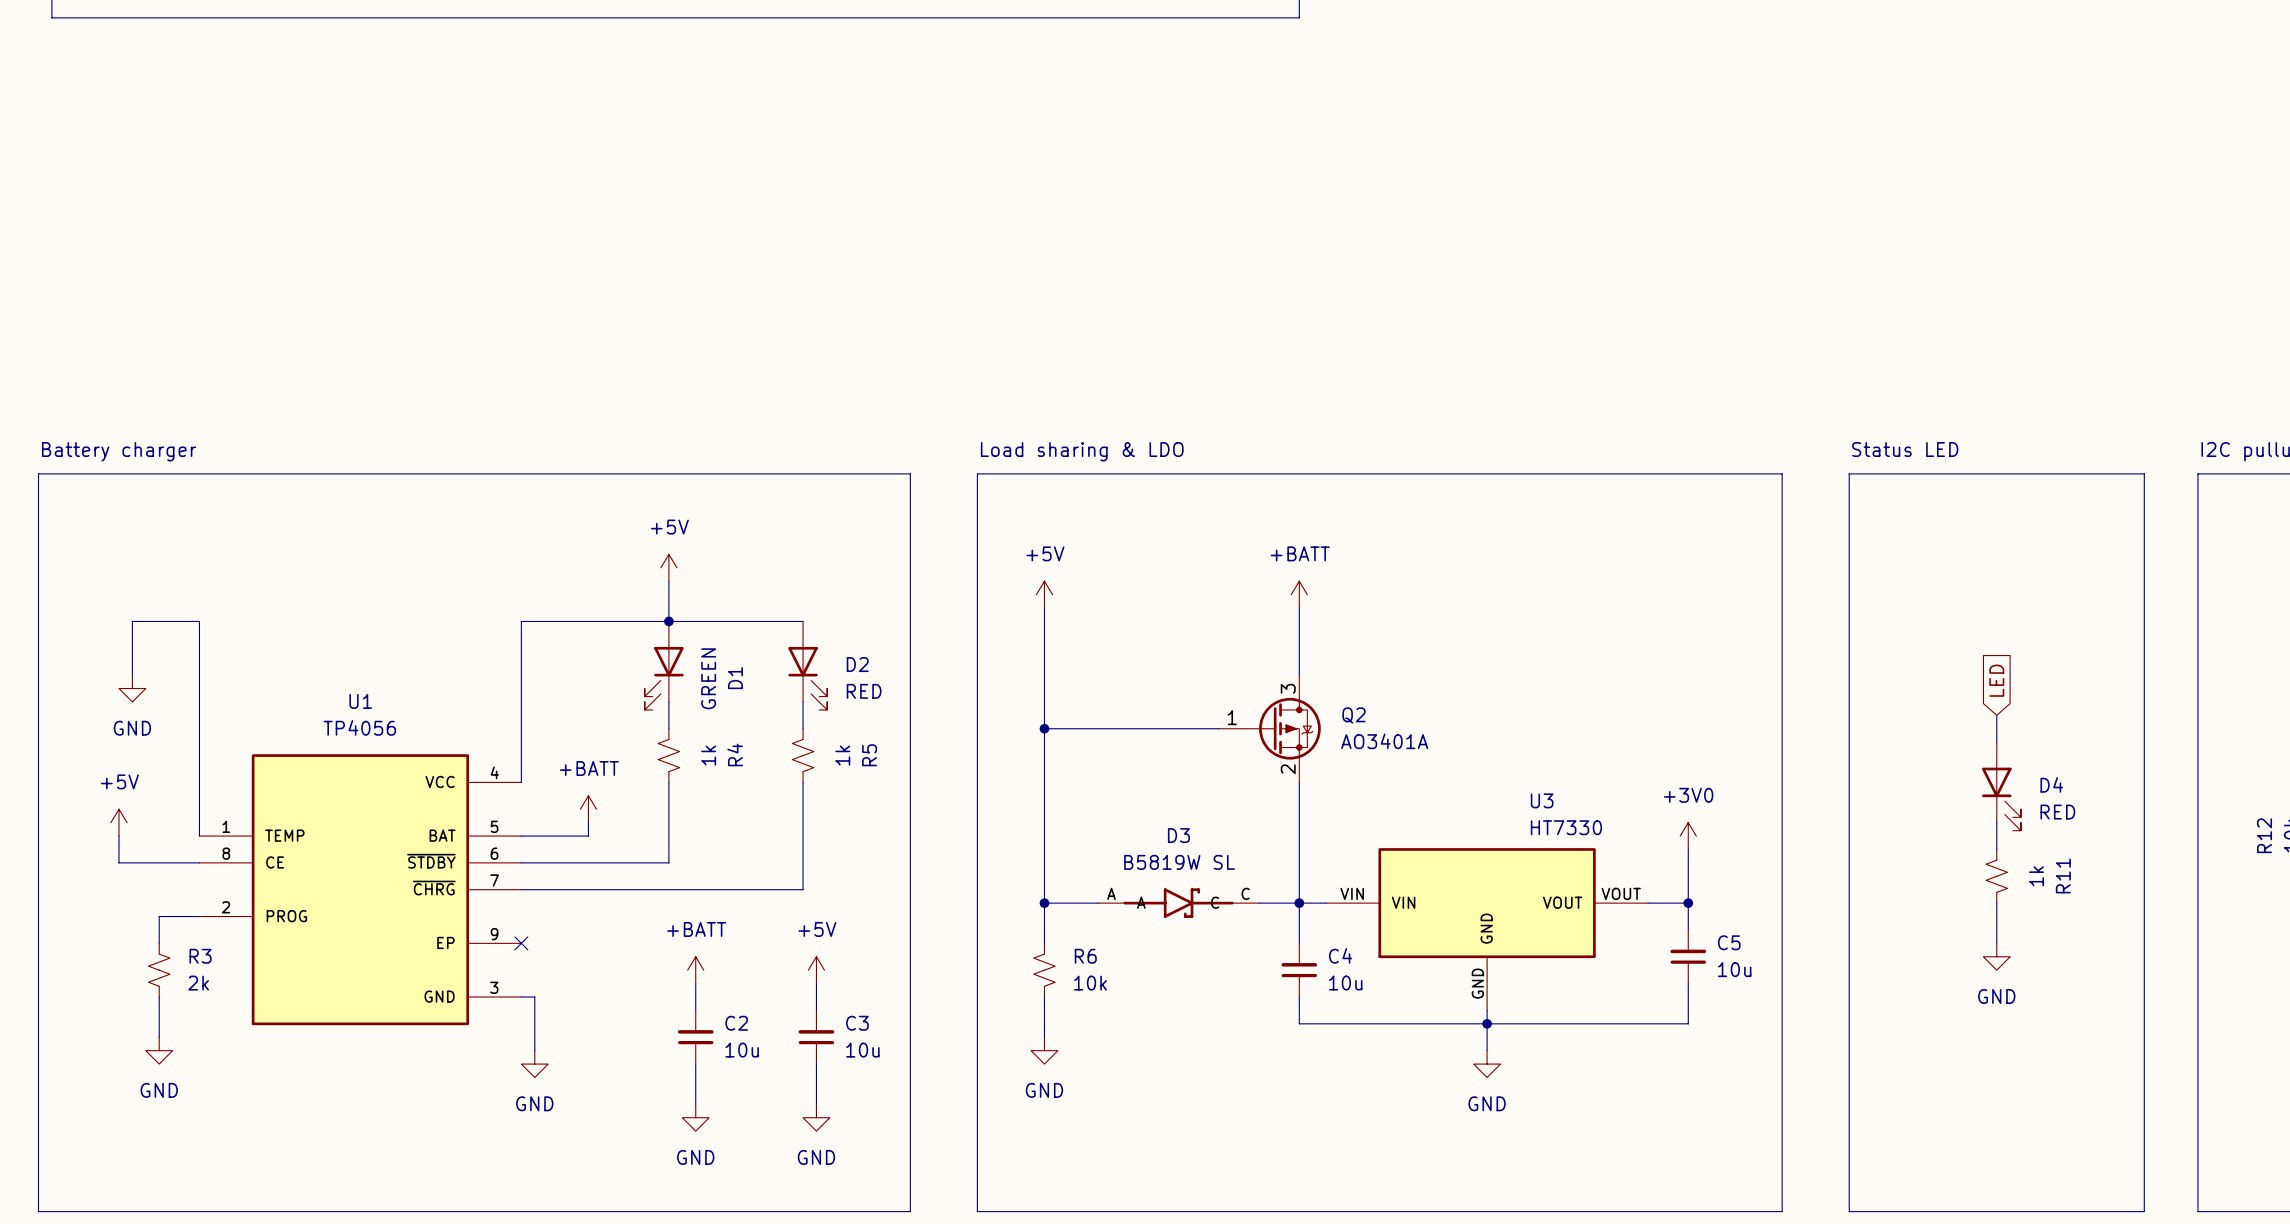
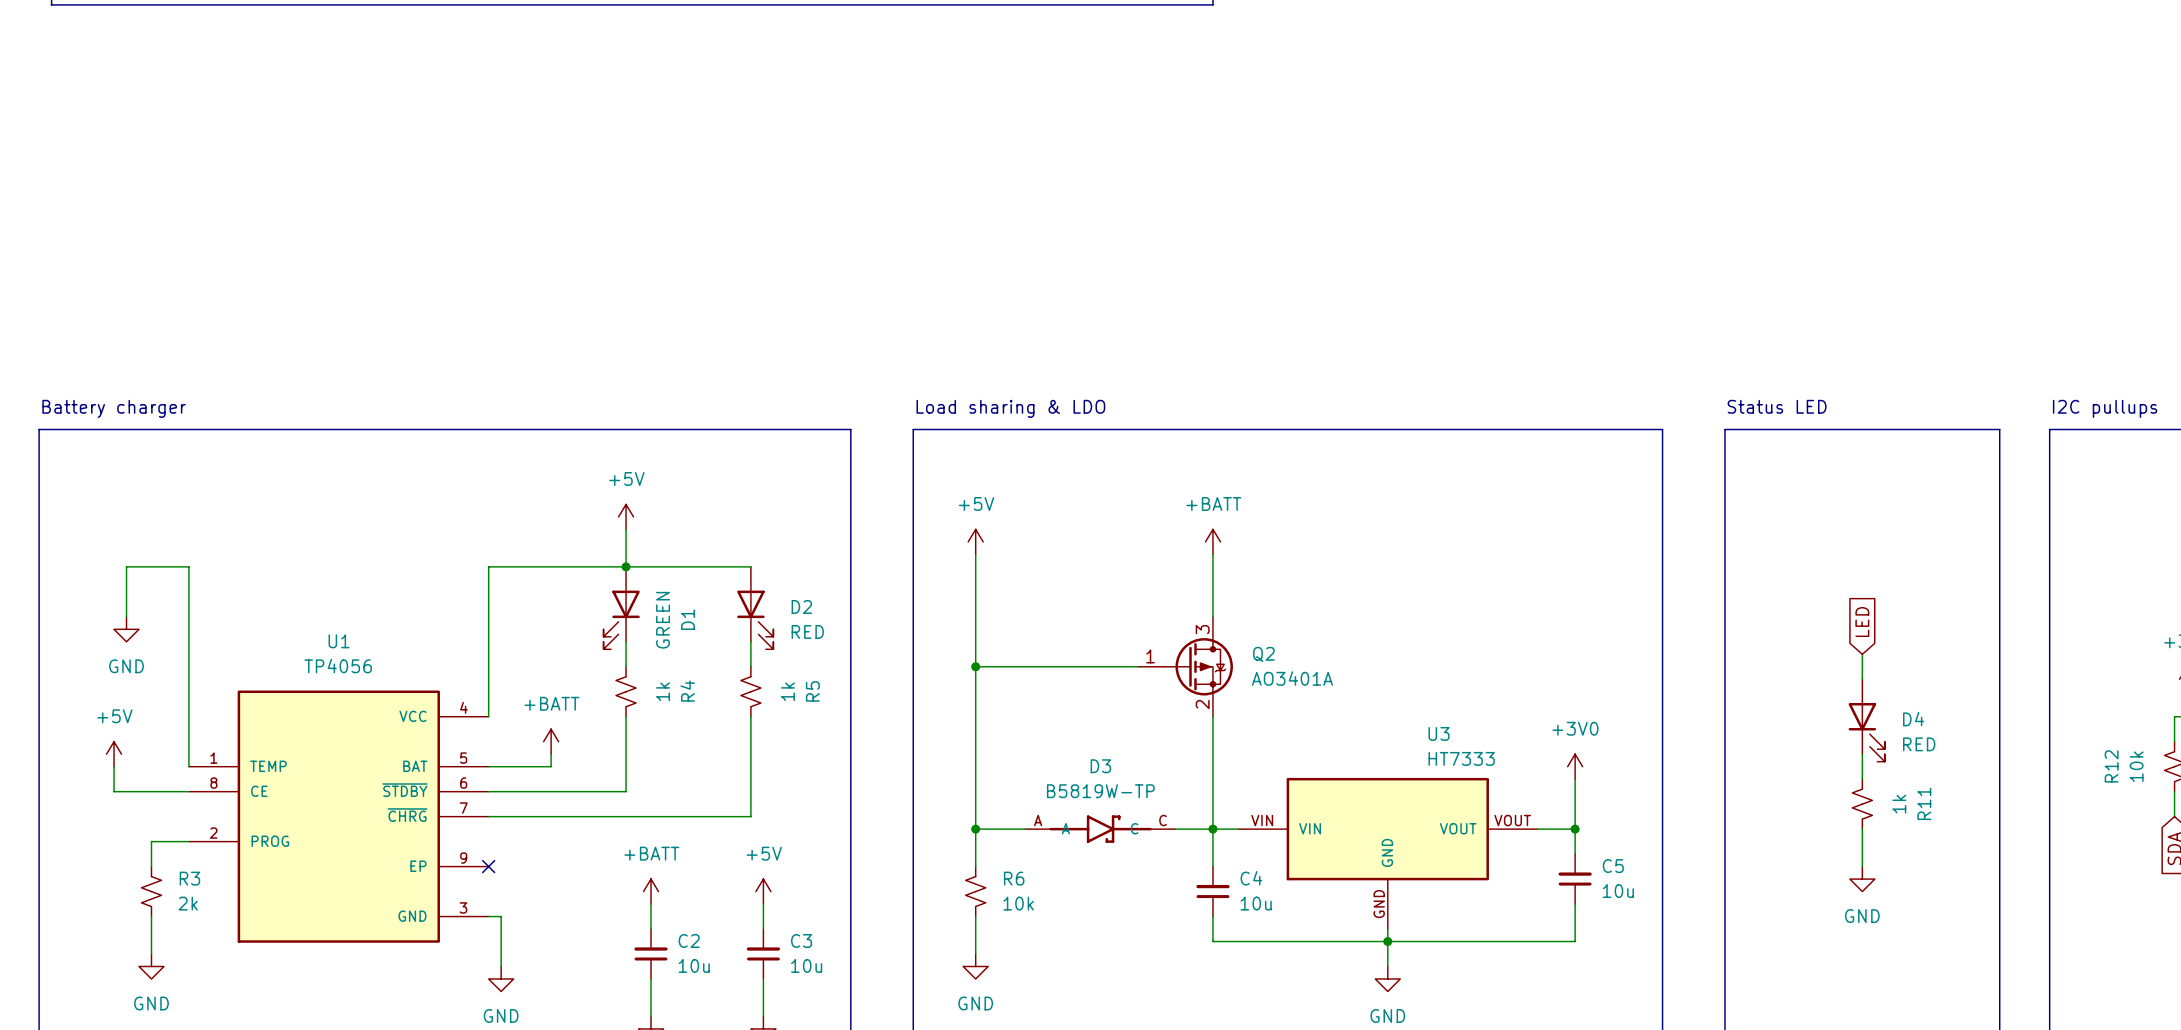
U3 value: HT7330 (1566, 827) -> HT7333 (1461, 758)
D3 value: B5819W SL (1179, 862) -> B5819W-TP (1100, 791)

